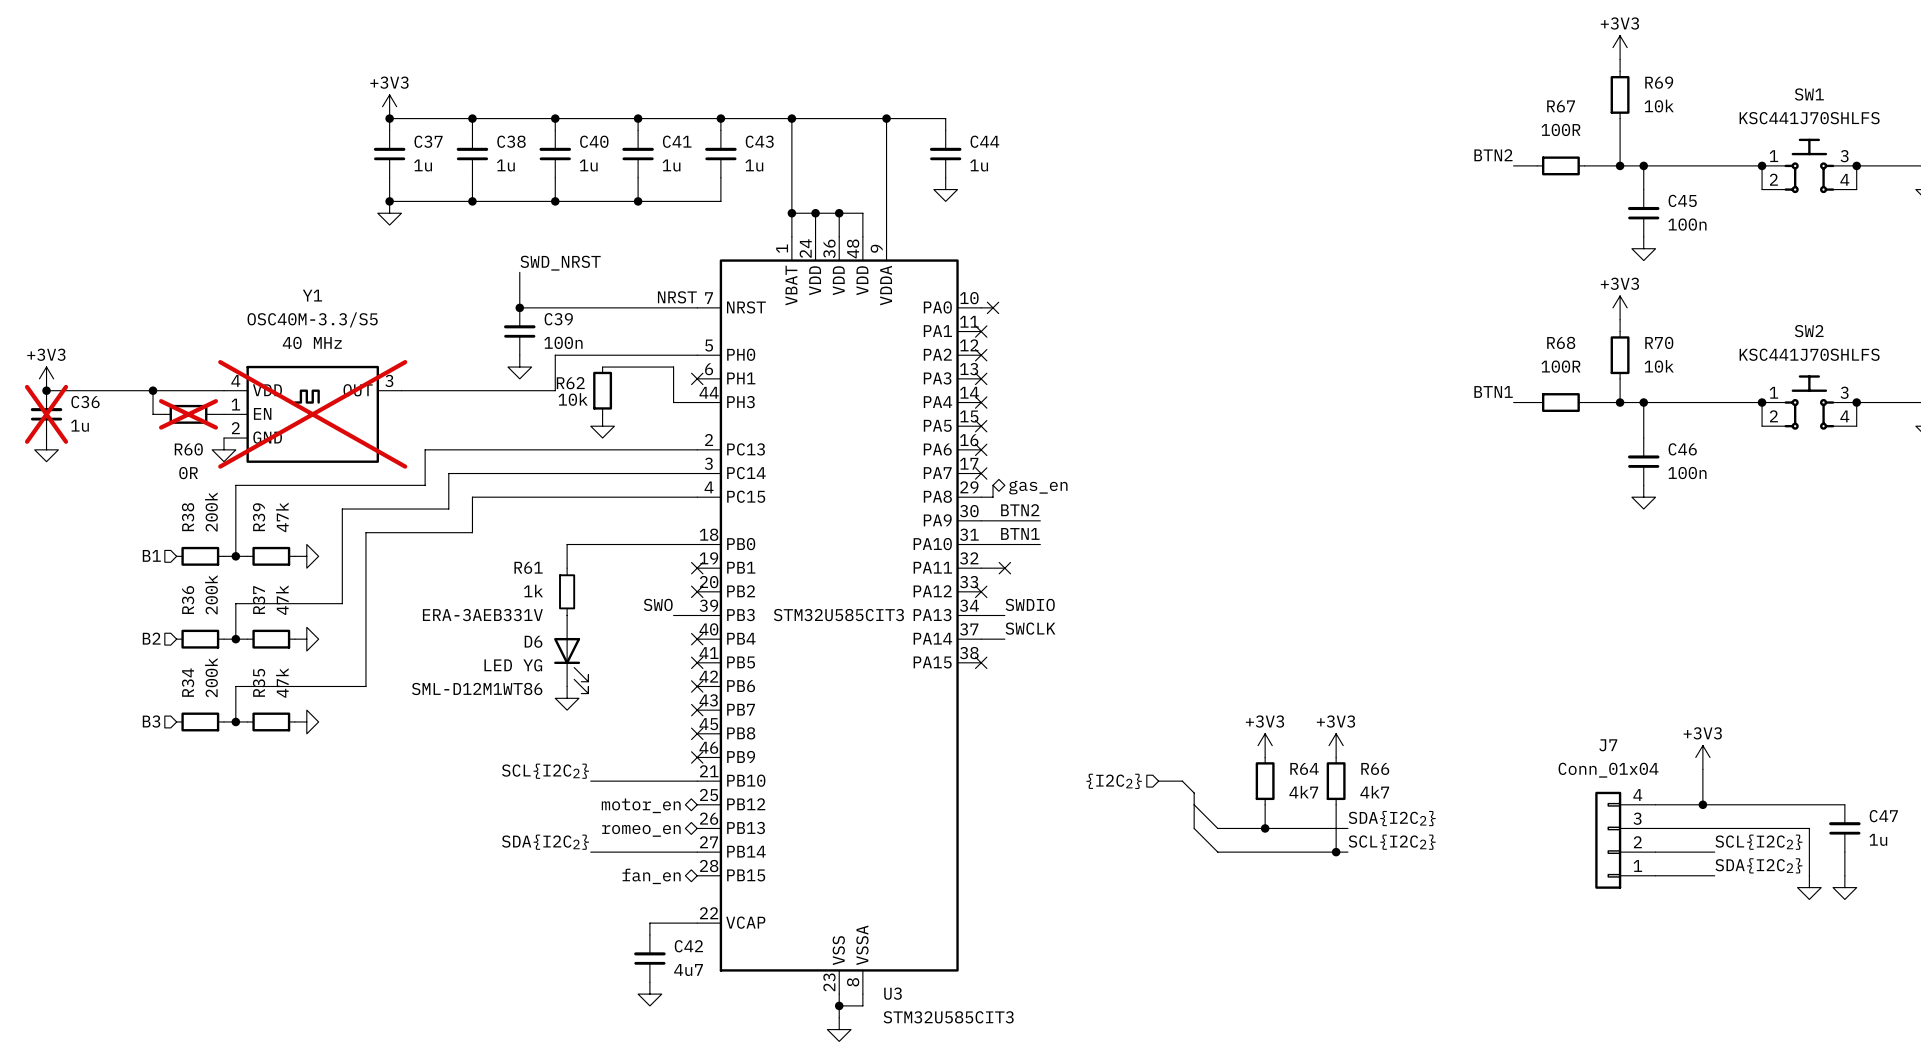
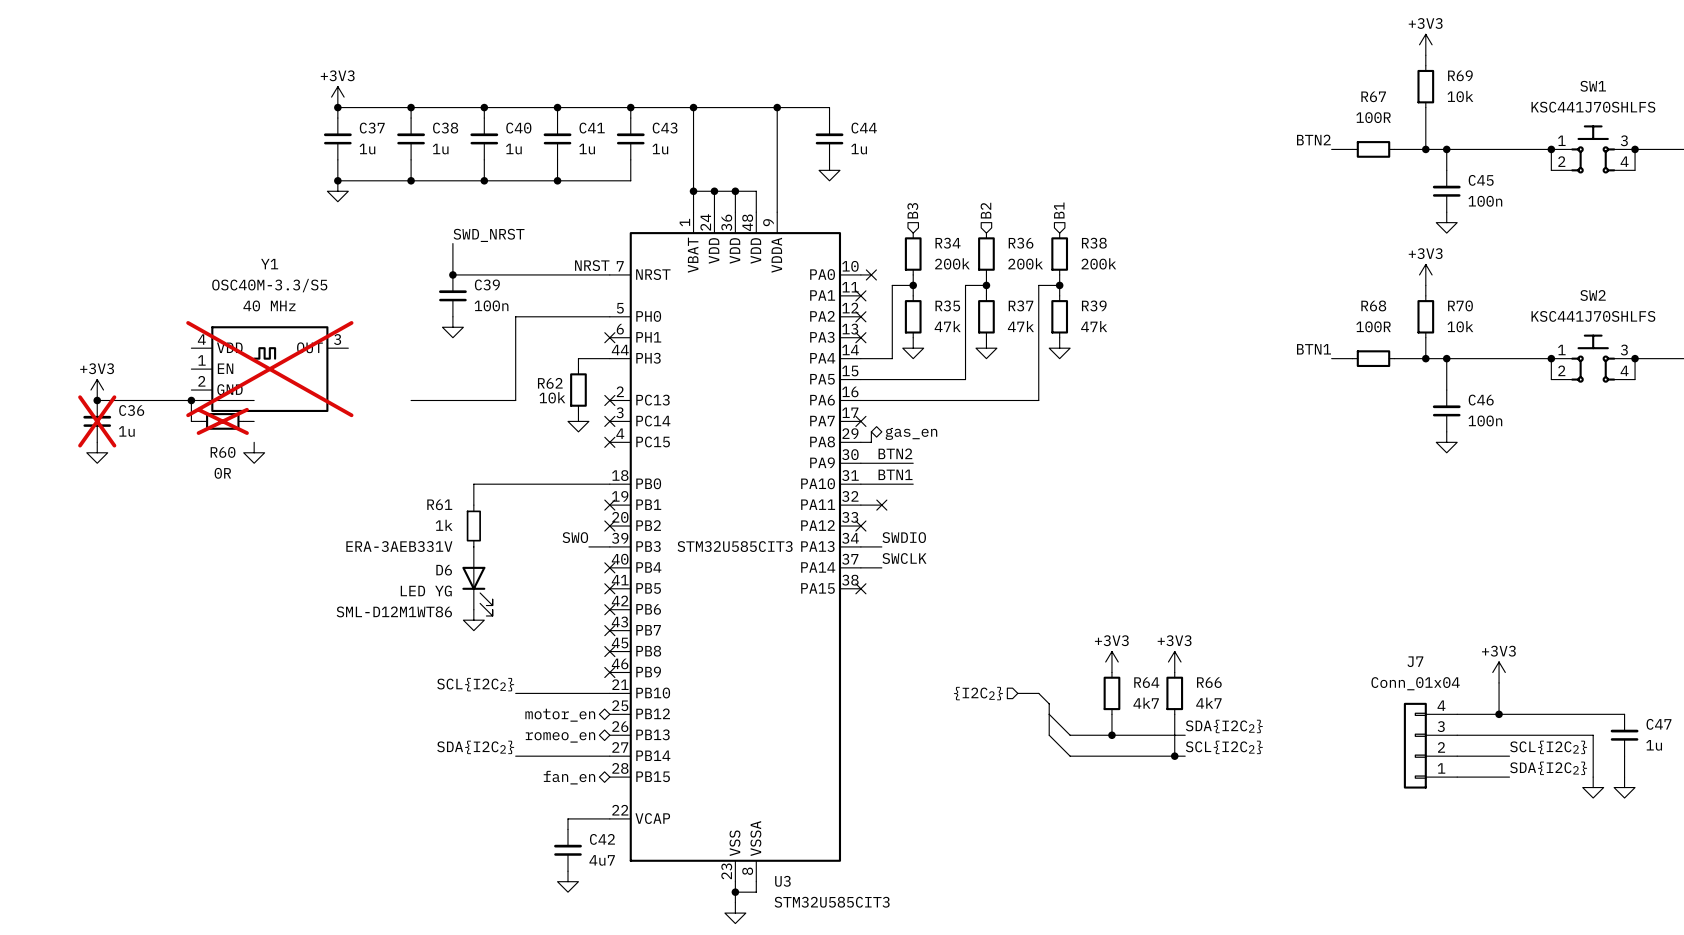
hierarchical label: none -> B3 (912, 210)
hierarchical label: none -> B2 (985, 210)
hierarchical label: none -> B1 (1059, 210)
wire: none -> (913, 274) (913, 295)
wire: none -> (986, 274) (986, 295)
wire: none -> (1059, 274) (1059, 295)
wire: none -> (913, 285) (892, 285) (892, 358) (860, 358)
junction: none -> (913, 285)
wire: none -> (986, 285) (965, 285) (965, 379) (860, 379)
junction: none -> (986, 285)
wire: none -> (1059, 285) (1038, 285) (1038, 400) (860, 400)
junction: none -> (1059, 285)
wire: (590, 355) (555, 355) (555, 390) (401, 390) -> none
wire: (602, 367) (673, 367) (673, 402) -> (578, 369) (578, 358) (588, 358)
power symbol position: +3V3 (46, 378) -> +3V3 (97, 390)
wire: (46, 390) (224, 390) -> (97, 400) (254, 400)
junction: (46, 390) -> none
wire: (153, 390) (153, 414) (164, 414) -> (191, 400) (191, 421) (201, 421)
junction: (153, 390) -> none
R62 position: (602, 390) -> (578, 390)
power symbol: none -> (913, 348)
power symbol: none -> (986, 348)
power symbol: none -> (1059, 348)
no-connect mark: (981, 402) -> none
C36 position: (46, 414) -> (97, 421)
R60 position: (188, 414) -> (222, 421)
wire: (212, 414) (224, 414) -> (243, 421) (254, 421)
power symbol position: (602, 426) -> (578, 421)
no-connect mark: (981, 426) -> none
power symbol: (46, 449) -> none
junction: none -> (97, 400)
junction: none -> (191, 400)
power symbol: (224, 449) -> none
wire: (472, 449) (425, 449) (425, 485) (235, 485) (235, 556) -> none
wire: (590, 449) (697, 449) -> (515, 400) (515, 316)
no-connect mark: none -> (609, 400)
no-connect mark: (981, 449) -> none
wire: (697, 473) (448, 473) (448, 509) (342, 509) (342, 603) (235, 603) (235, 639) -> none
no-connect mark: none -> (609, 421)
wire: (697, 497) (472, 497) (472, 532) (365, 532) (365, 686) (235, 686) (235, 721) -> none
no-connect mark: none -> (609, 442)
power symbol: none -> (97, 452)
power symbol: none -> (254, 452)
wire: (567, 544) (567, 568) -> (494, 484) (473, 484) (473, 505)
hierarchical label: B1 (151, 555) -> none
R38 rotation: 0° (200, 556) -> 90° clockwise (1059, 254)
R38 position: (200, 556) -> (1059, 254)
wire: (224, 556) (247, 556) -> none
junction: (235, 556) -> none
R39 rotation: 0° (271, 556) -> 90° clockwise (1059, 316)
R39 position: (271, 556) -> (1059, 316)
power symbol: (306, 556) -> none
R61 position: (567, 591) -> (473, 526)
hierarchical label: B2 (151, 638) -> none
R36 rotation: 0° (200, 639) -> 90° clockwise (986, 254)
R36 position: (200, 639) -> (986, 254)
wire: (224, 639) (247, 639) -> none
junction: (235, 639) -> none
R37 rotation: 0° (271, 639) -> 90° clockwise (986, 316)
R37 position: (271, 639) -> (986, 316)
power symbol: (306, 639) -> none
D6 position: (571, 654) -> (477, 581)
power symbol position: (567, 698) -> (473, 620)
hierarchical label: B3 (151, 721) -> none
R34 rotation: 0° (200, 721) -> 90° clockwise (913, 254)
R34 position: (200, 721) -> (913, 254)
wire: (224, 721) (247, 721) -> none
junction: (235, 721) -> none
R35 rotation: 0° (271, 721) -> 90° clockwise (913, 316)
R35 position: (271, 721) -> (913, 316)
power symbol: (306, 721) -> none

